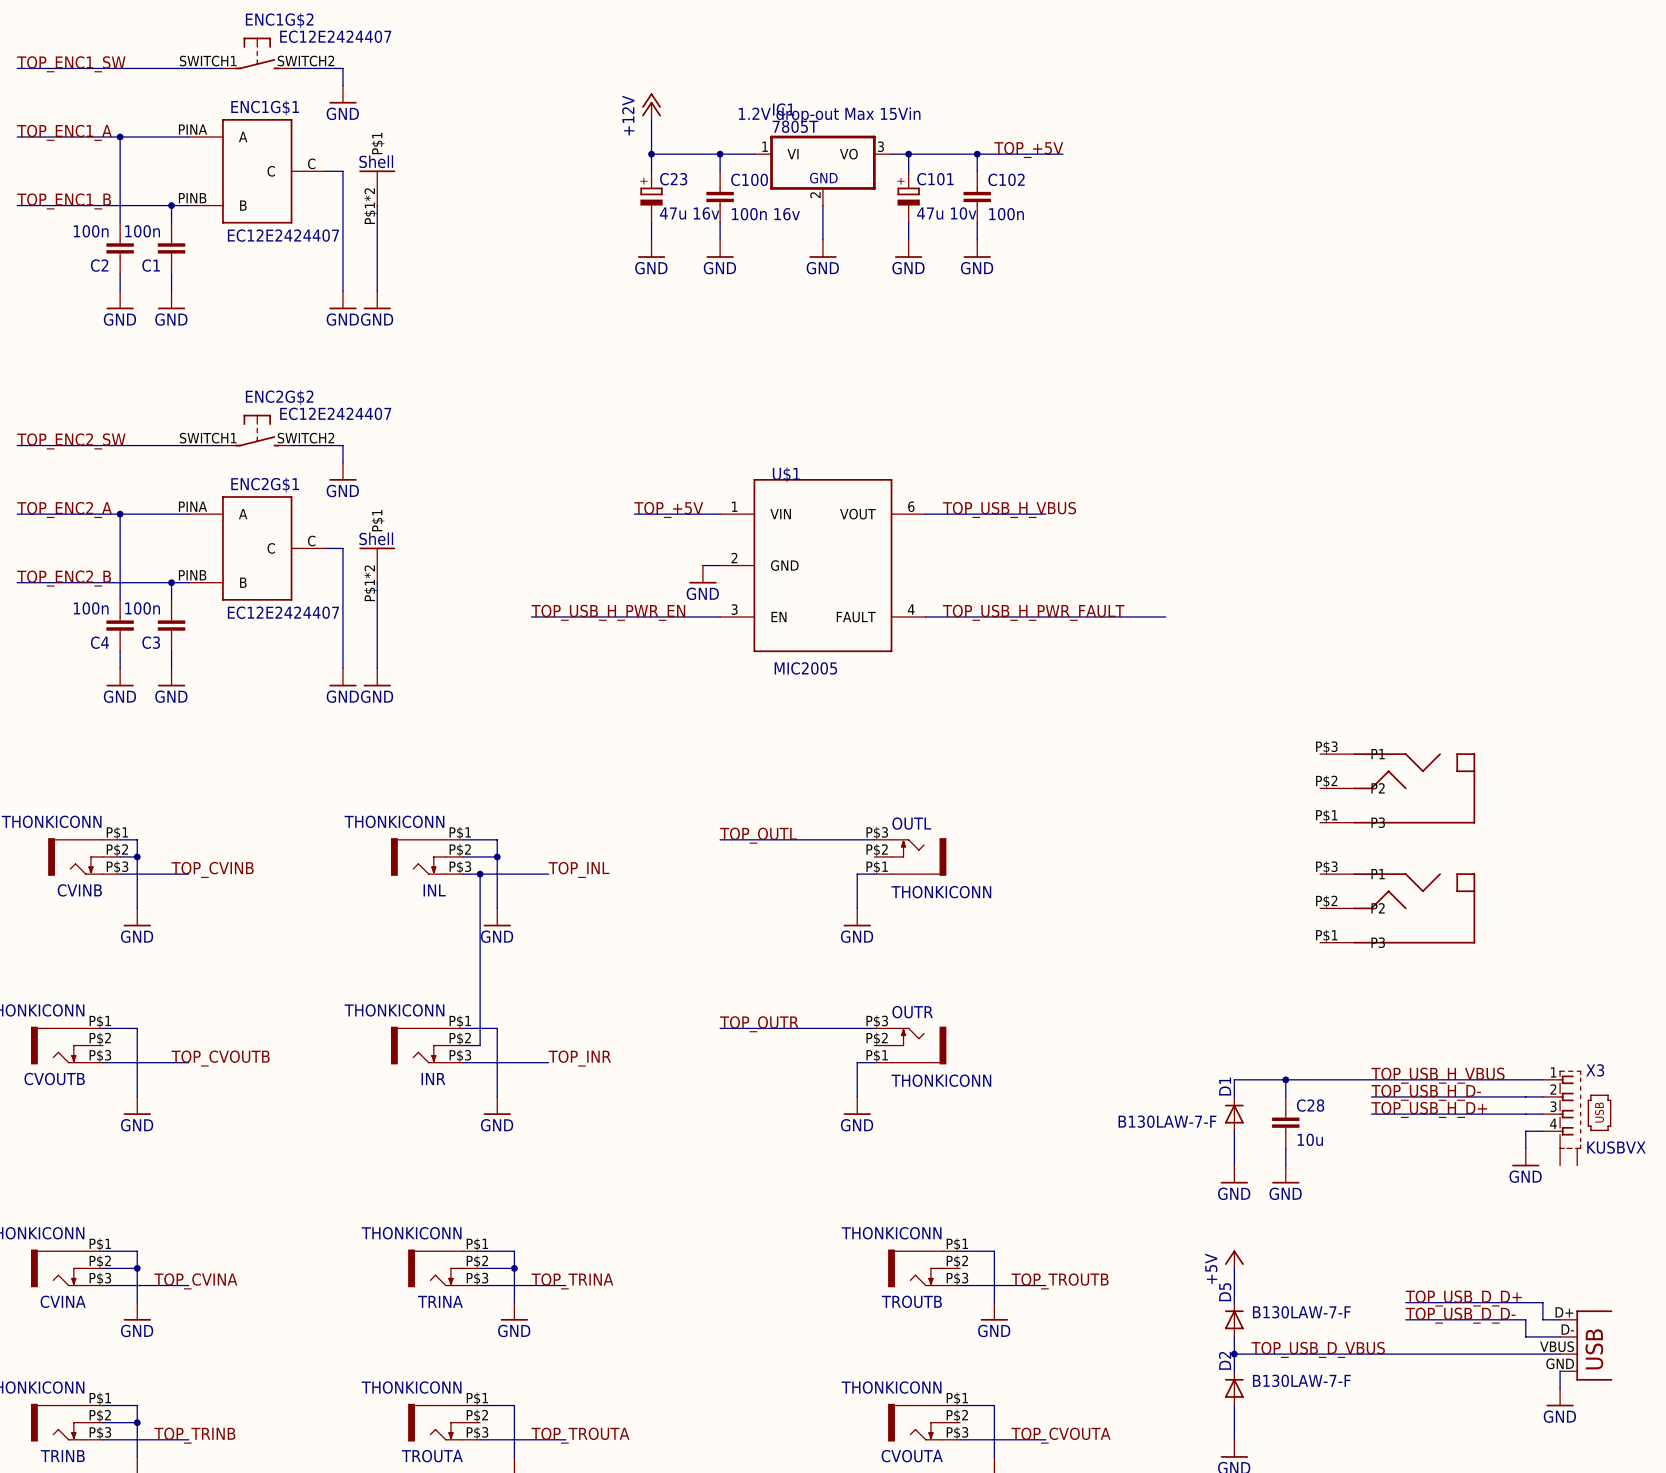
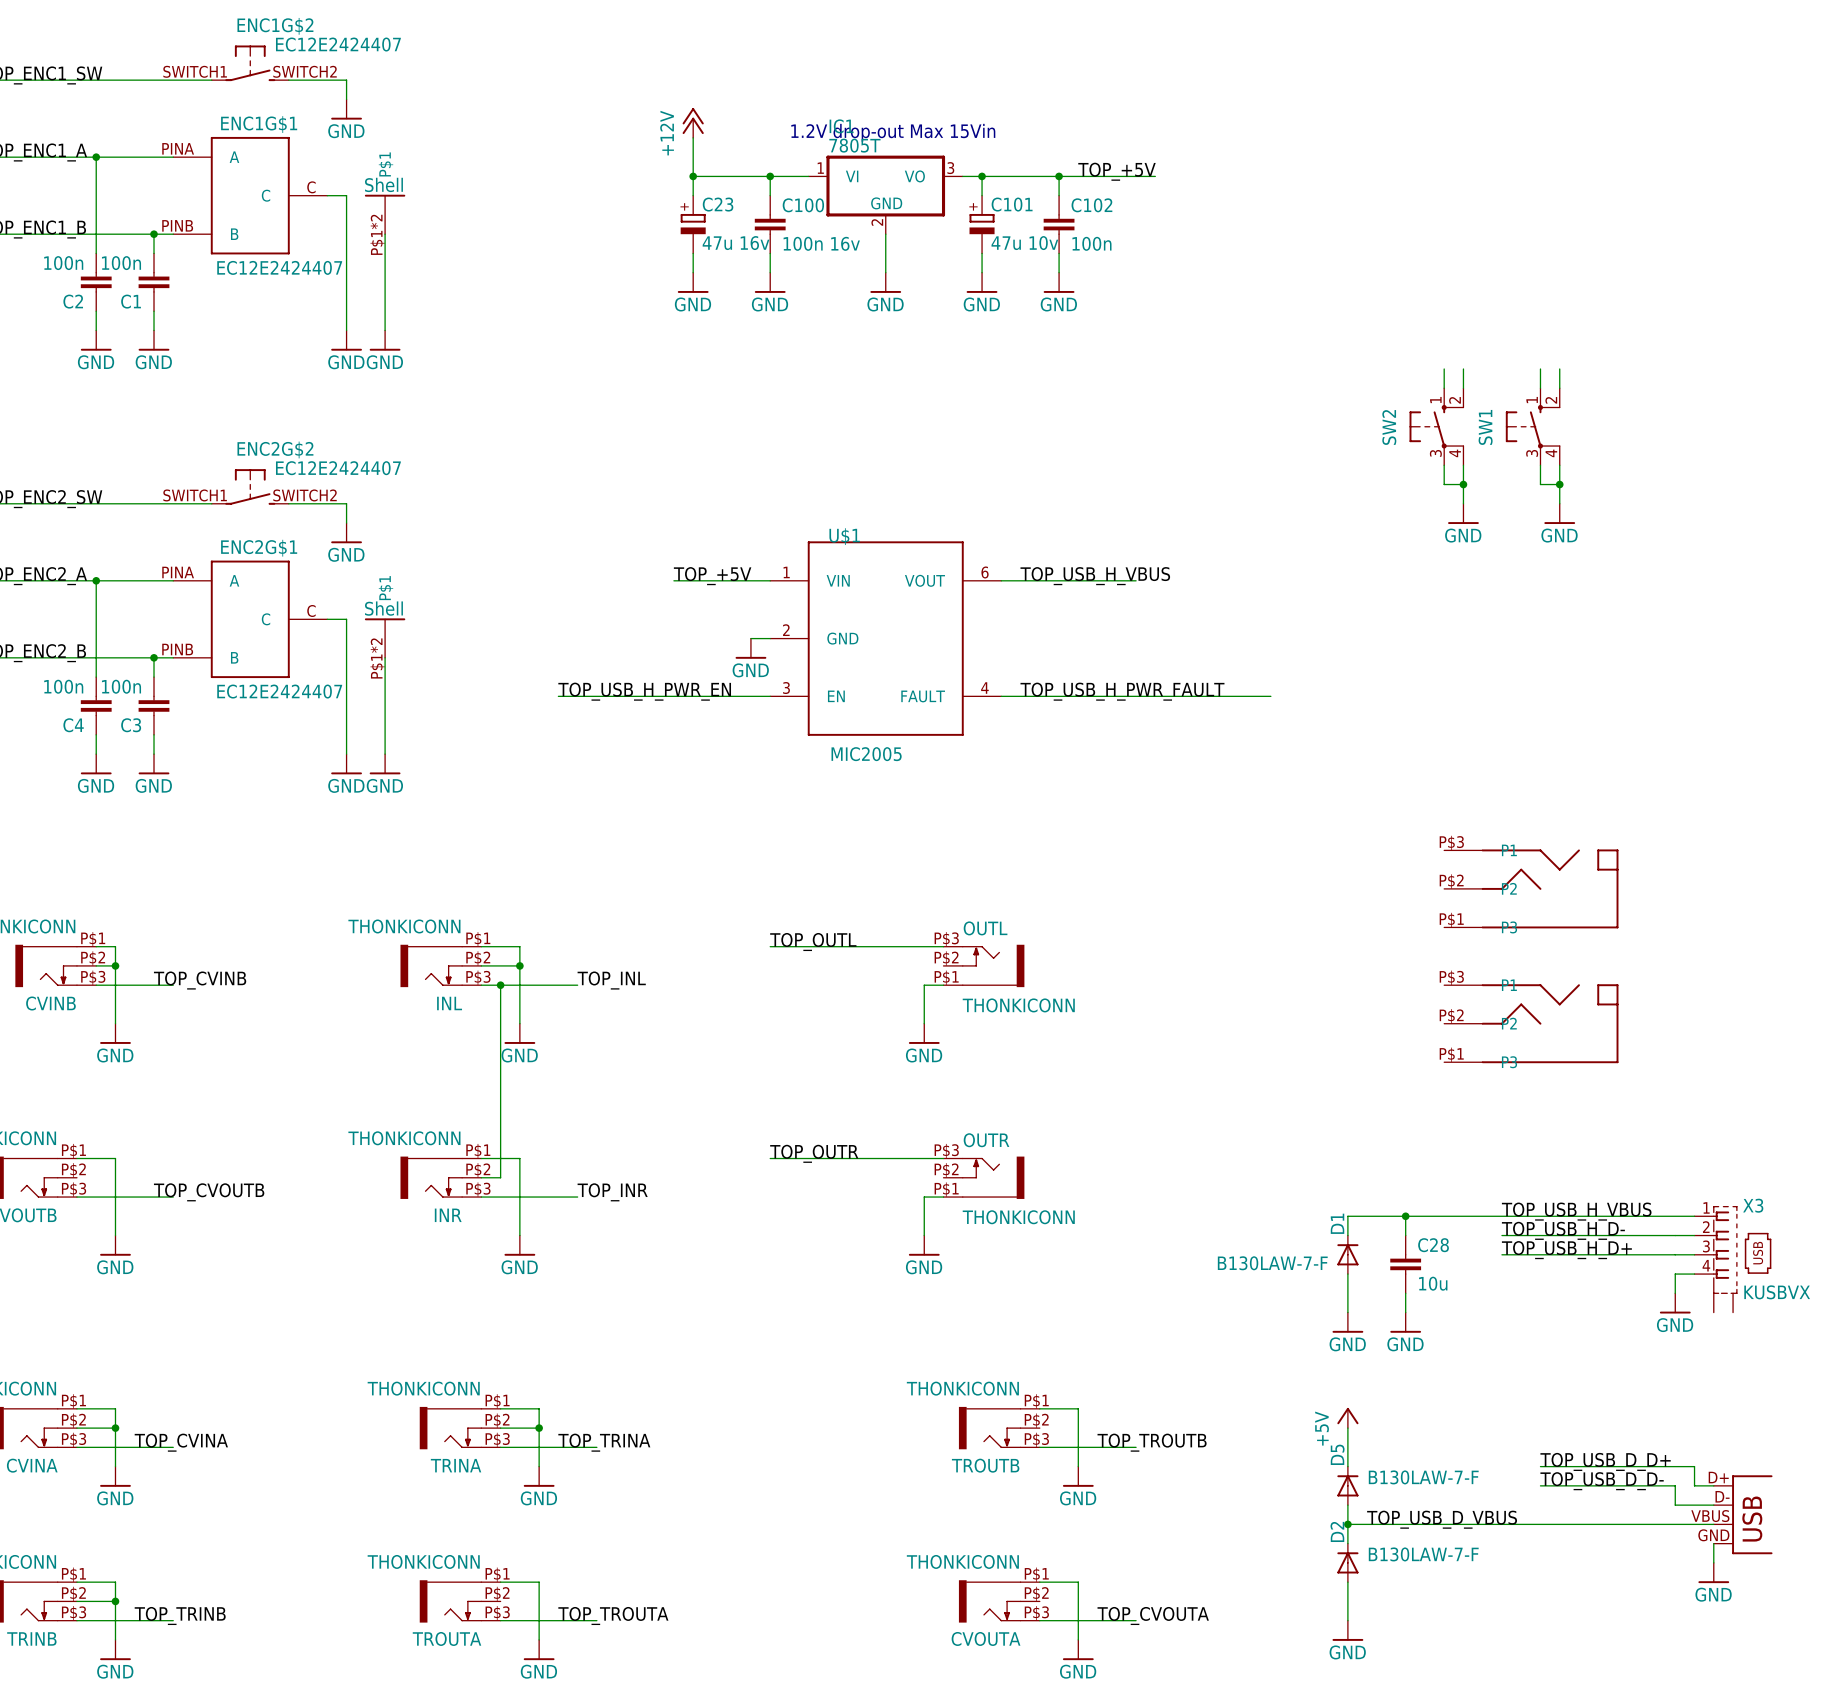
wire: none -> (1444, 368) (1444, 388)
wire: none -> (1463, 368) (1463, 388)
wire: none -> (1540, 368) (1540, 388)
wire: none -> (1559, 368) (1559, 388)
SW2: none -> (1436, 426)
SW1: none -> (1533, 426)
wire: none -> (1444, 465) (1444, 484) (1463, 484)
wire: none -> (1463, 465) (1463, 503)
wire: none -> (1540, 465) (1540, 484) (1559, 484)
wire: none -> (1559, 465) (1559, 503)
junction: none -> (1463, 484)
junction: none -> (1559, 484)
power symbol: none -> GND (1463, 513)
power symbol: none -> GND (1559, 513)

